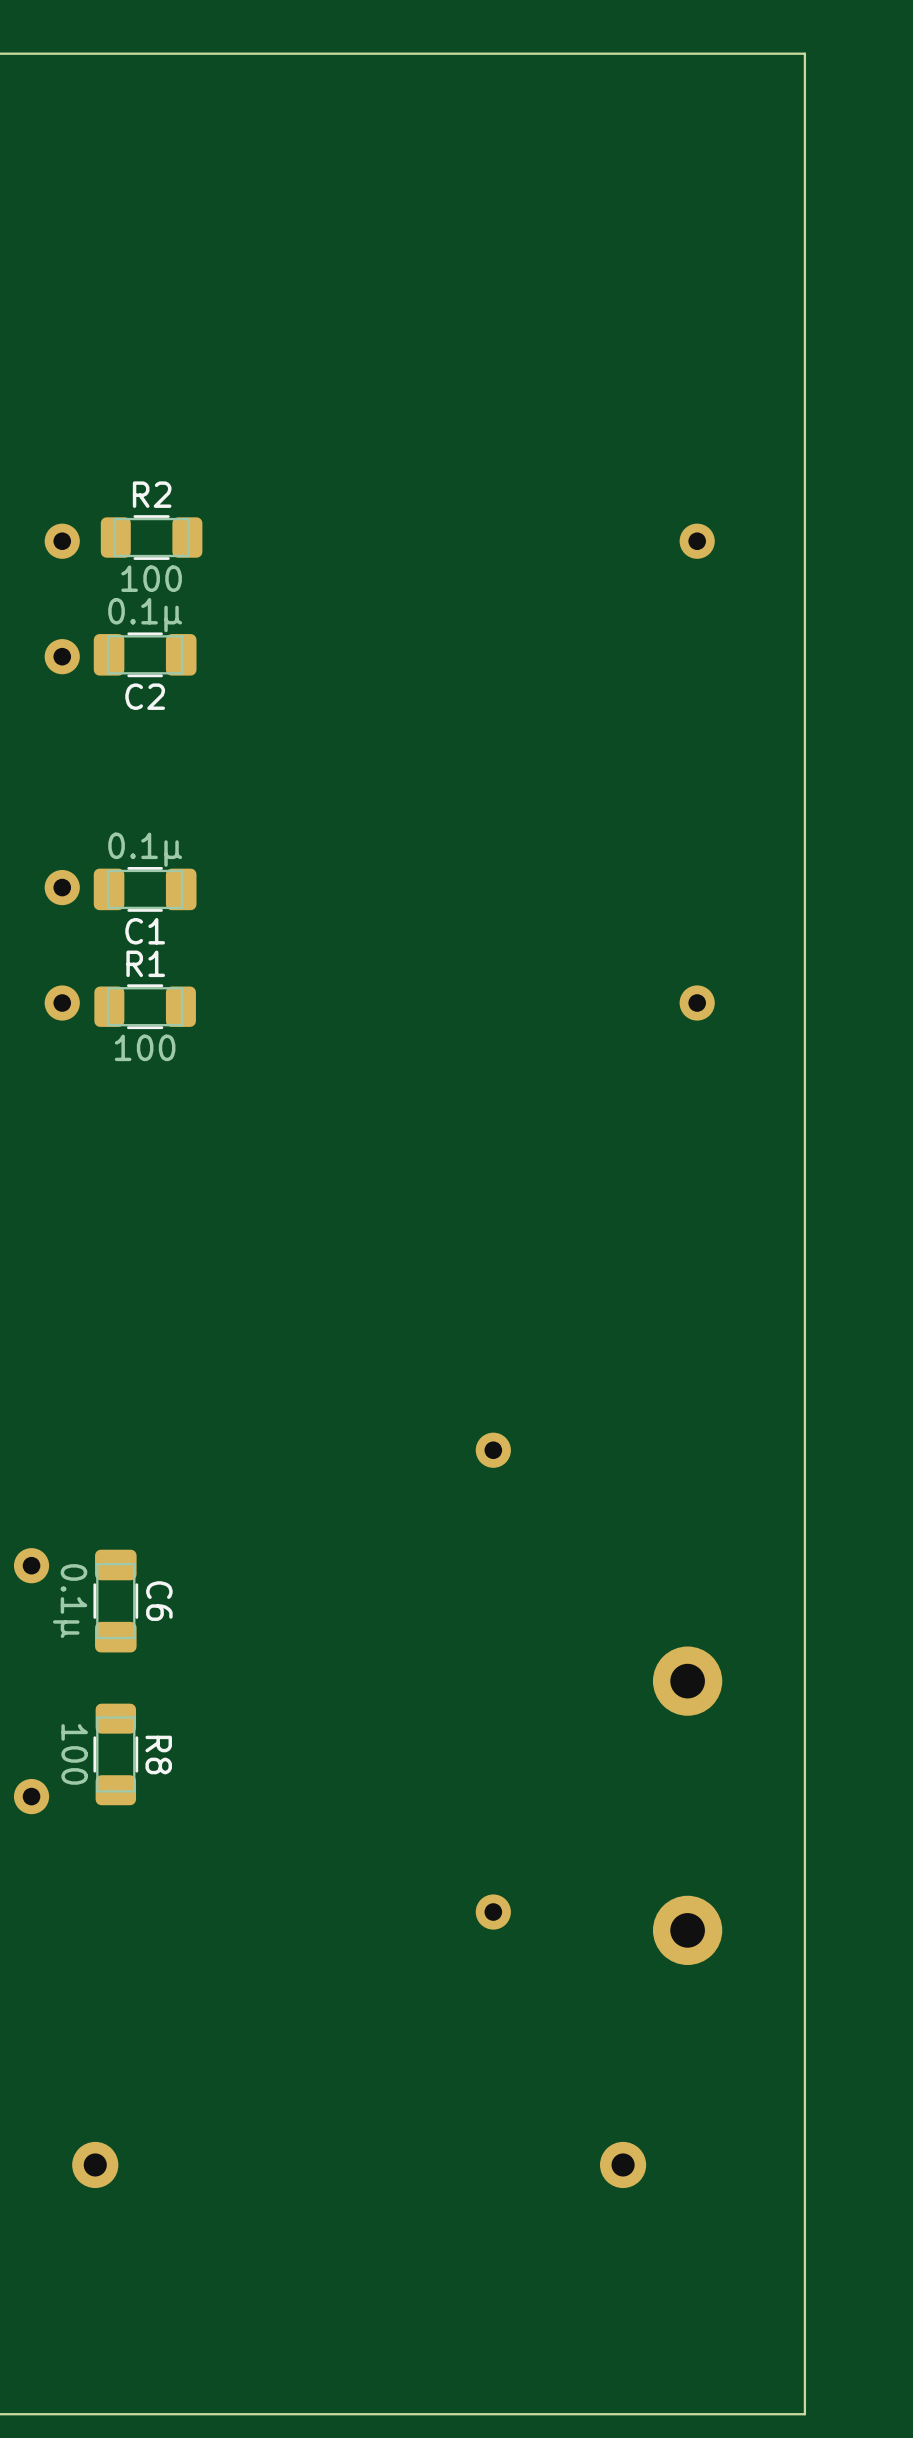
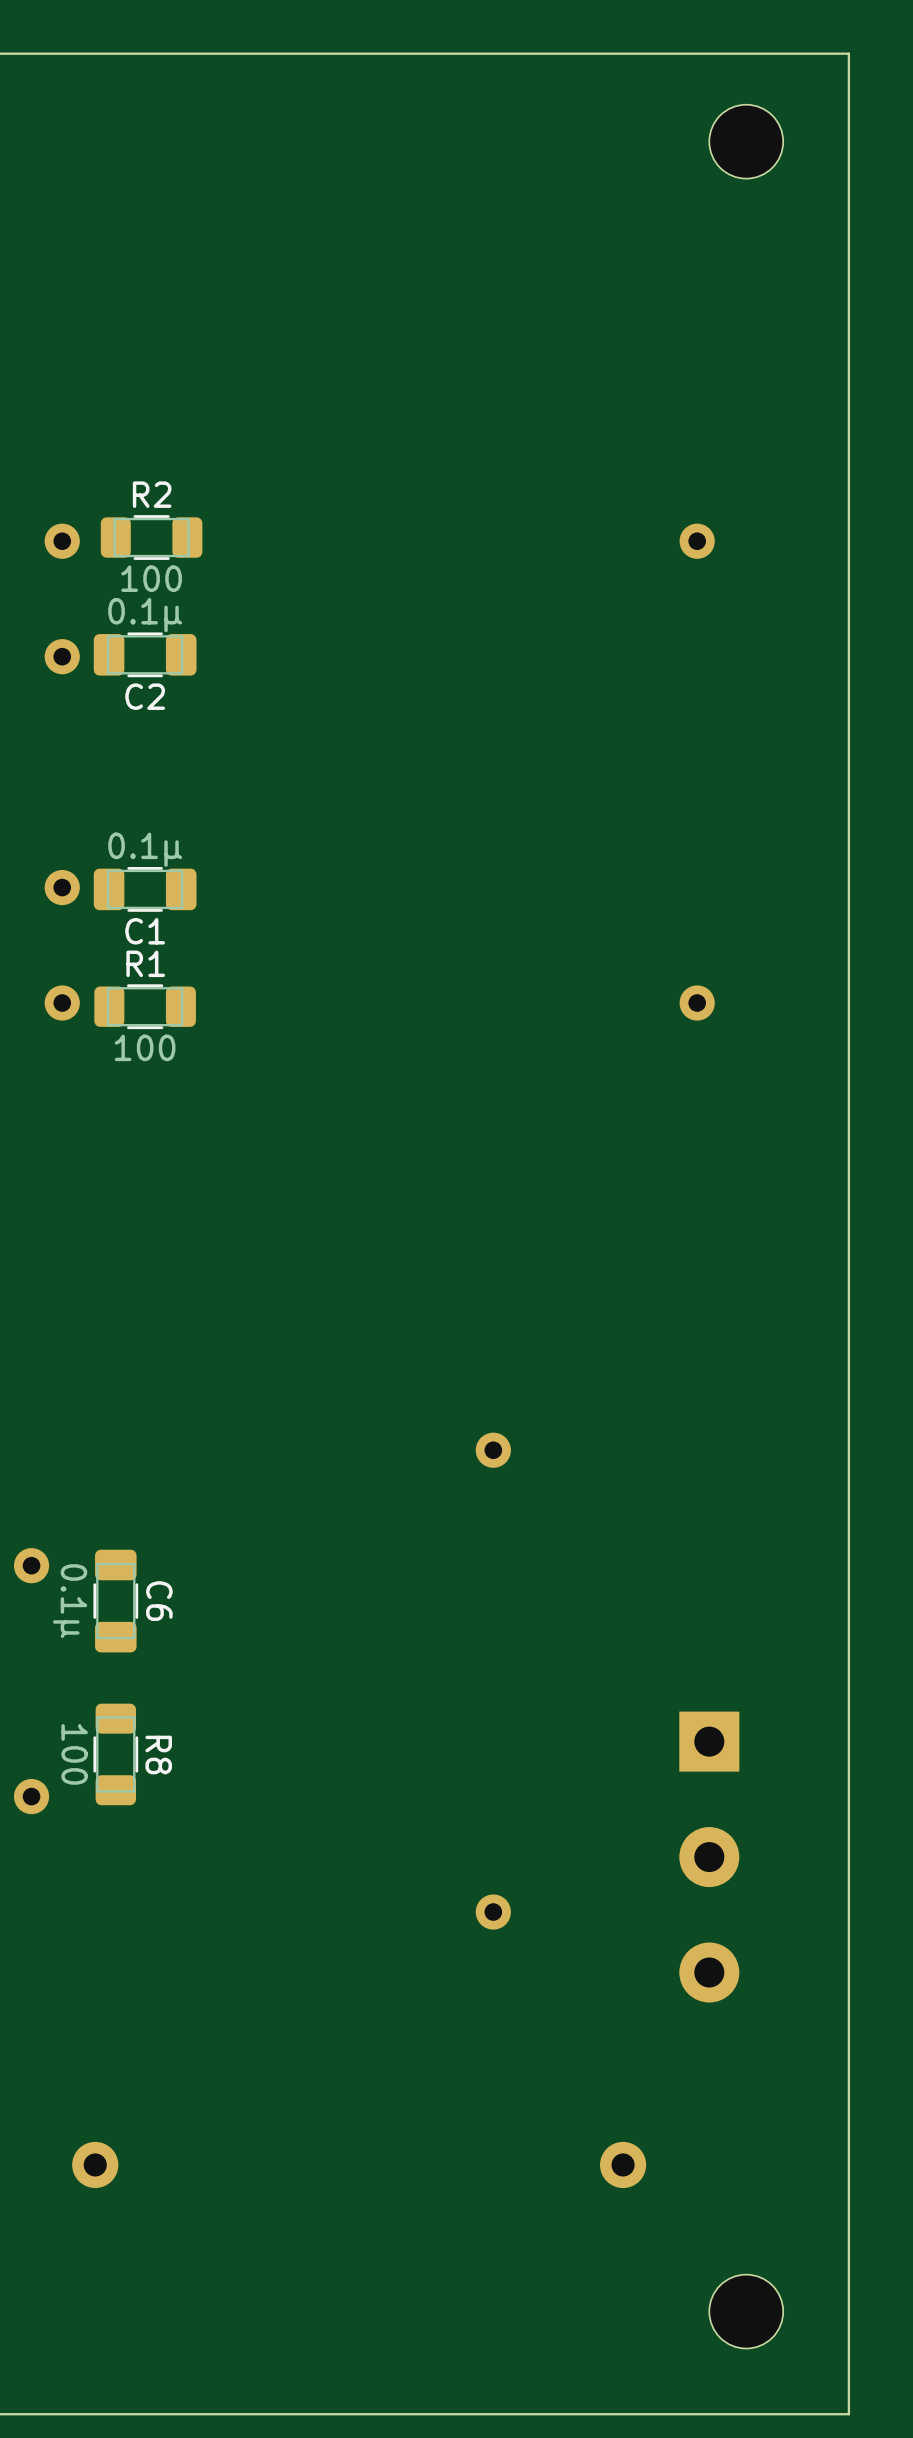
board edge: (804, 53) (804, 2414) -> (804, 53) (848, 53) (848, 2414) (804, 2414)
part: none -> (746, 141)
part: (687, 1681) -> none
part: none -> (709, 1857)
part: (687, 1930) -> none
part: none -> (746, 2311)

